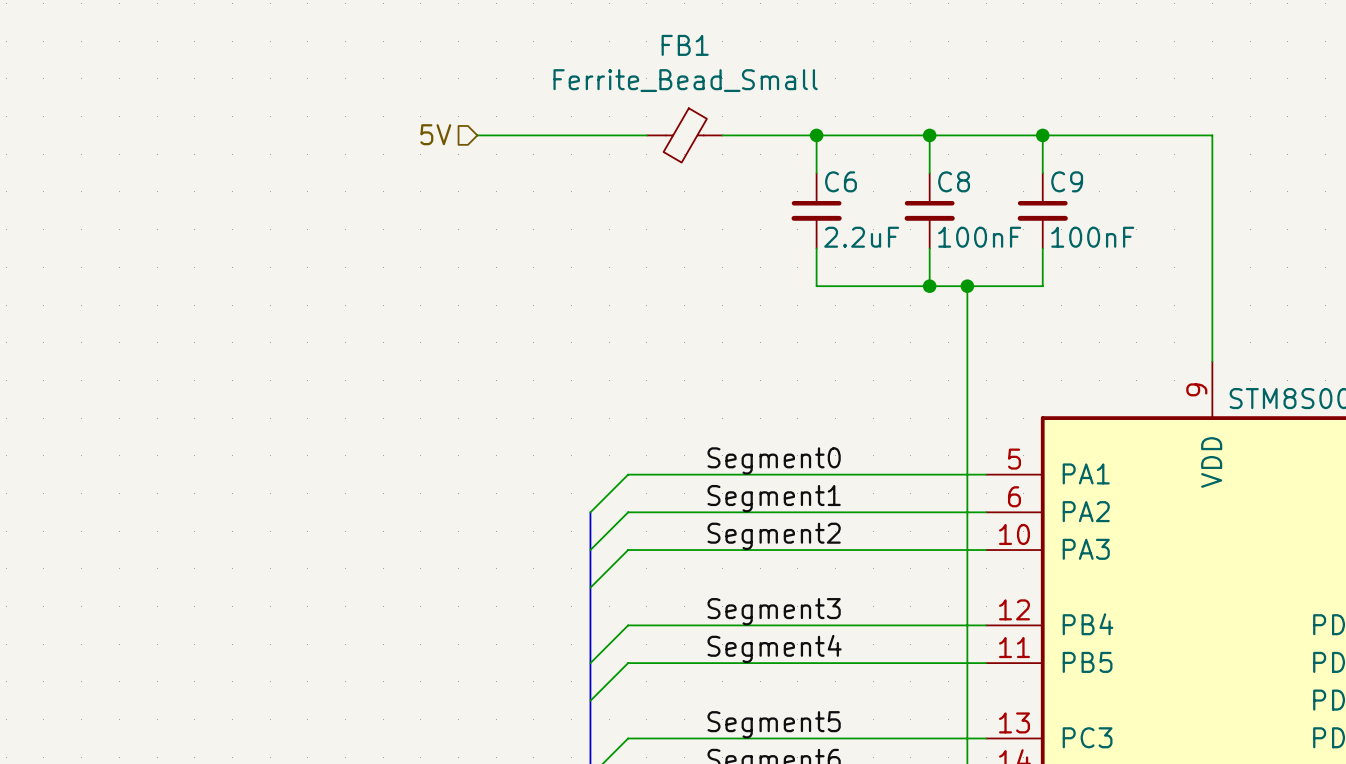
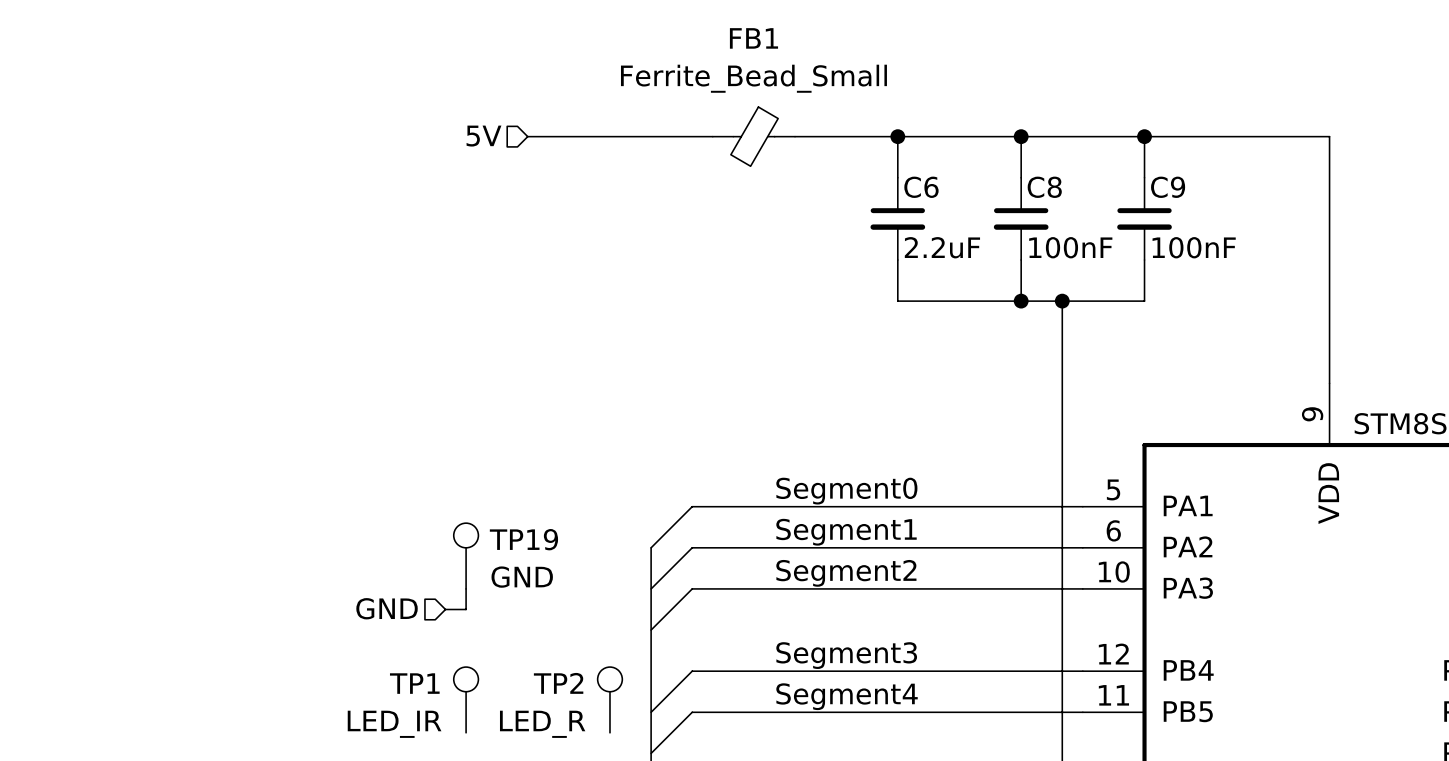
TP19: none -> GND (466, 556)
wire: none -> (466, 588) (466, 609) (445, 609)
hierarchical label: none -> GND (387, 608)
TP1: none -> LED_IR (466, 699)
TP2: none -> LED_R (609, 699)

